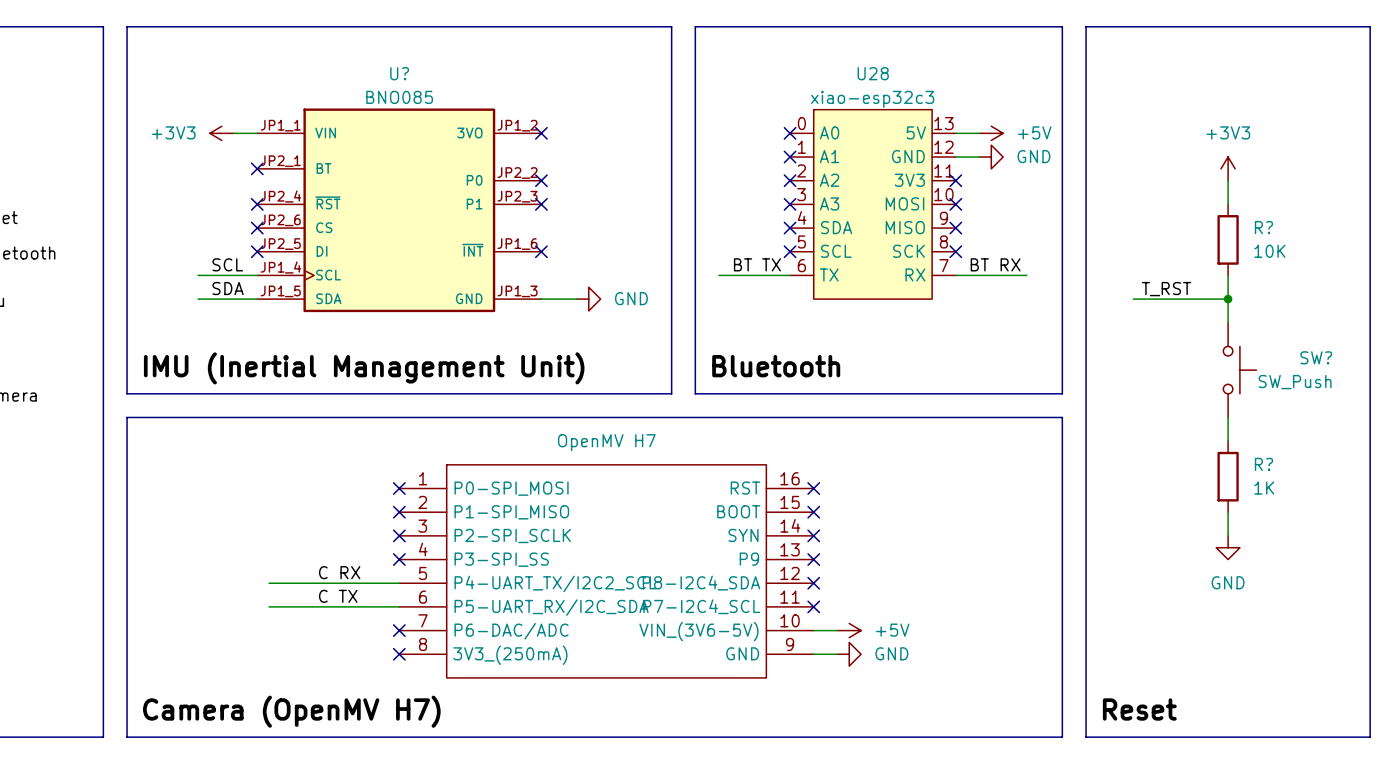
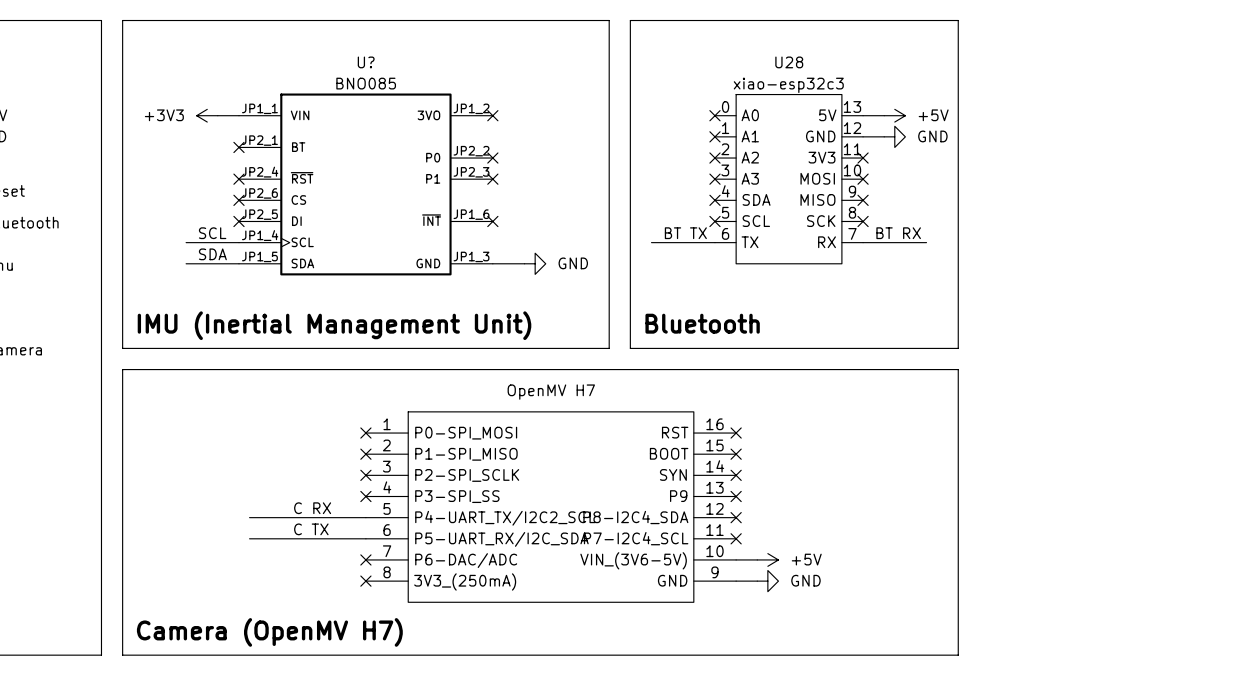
line: (1086, 26) (1370, 26) (1370, 737) (1086, 737) (1086, 26) -> none
power symbol: +3V3 (1228, 168) -> none
wire: (1228, 180) (1228, 204) -> none
R?: 10K (1228, 239) -> none
wire: (1228, 275) (1228, 322) -> none
label: T_RST (1166, 289) -> none
wire: (1133, 299) (1228, 299) -> none
junction: (1228, 299) -> none
SW?: SW_Push (1239, 370) -> none
wire: (1228, 417) (1228, 441) -> none
R?: 1K (1228, 476) -> none
wire: (1228, 512) (1228, 535) -> none
power symbol: GND (1228, 547) -> none
label: Reset (1139, 709) -> none

